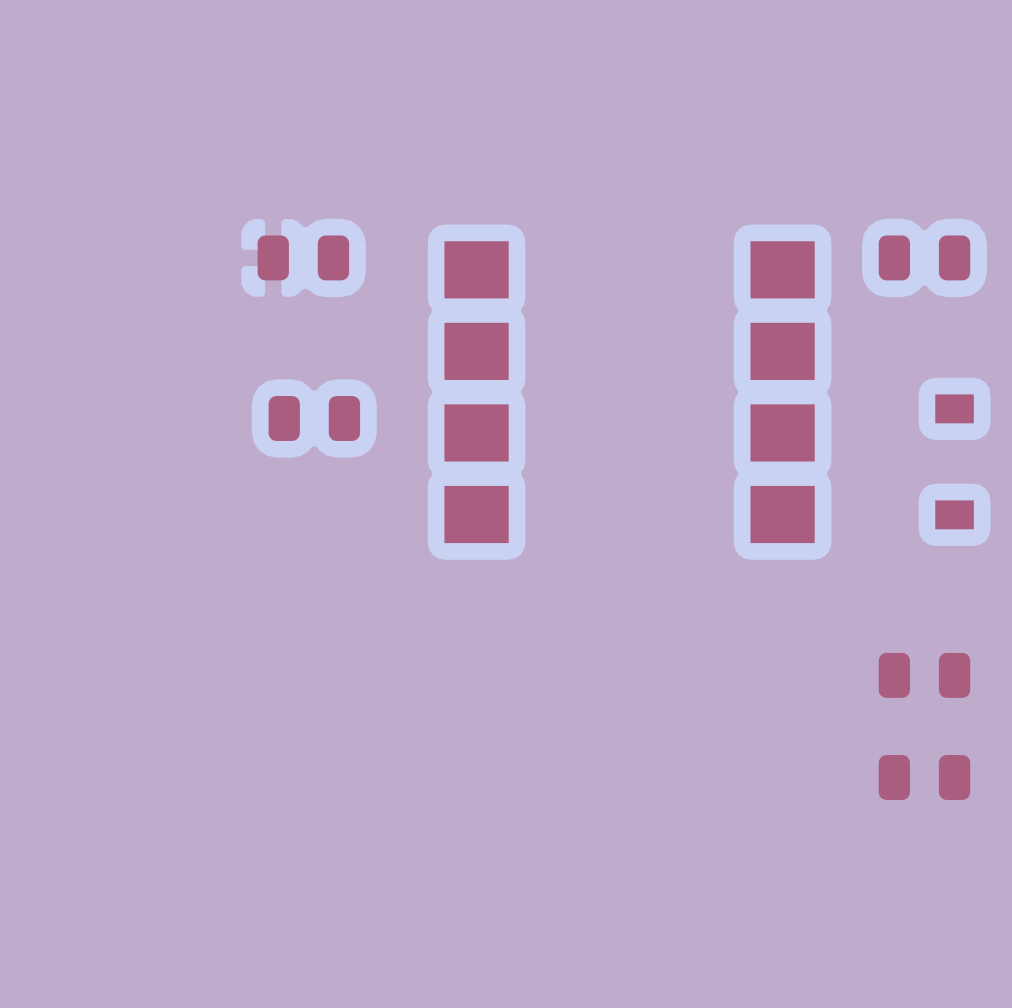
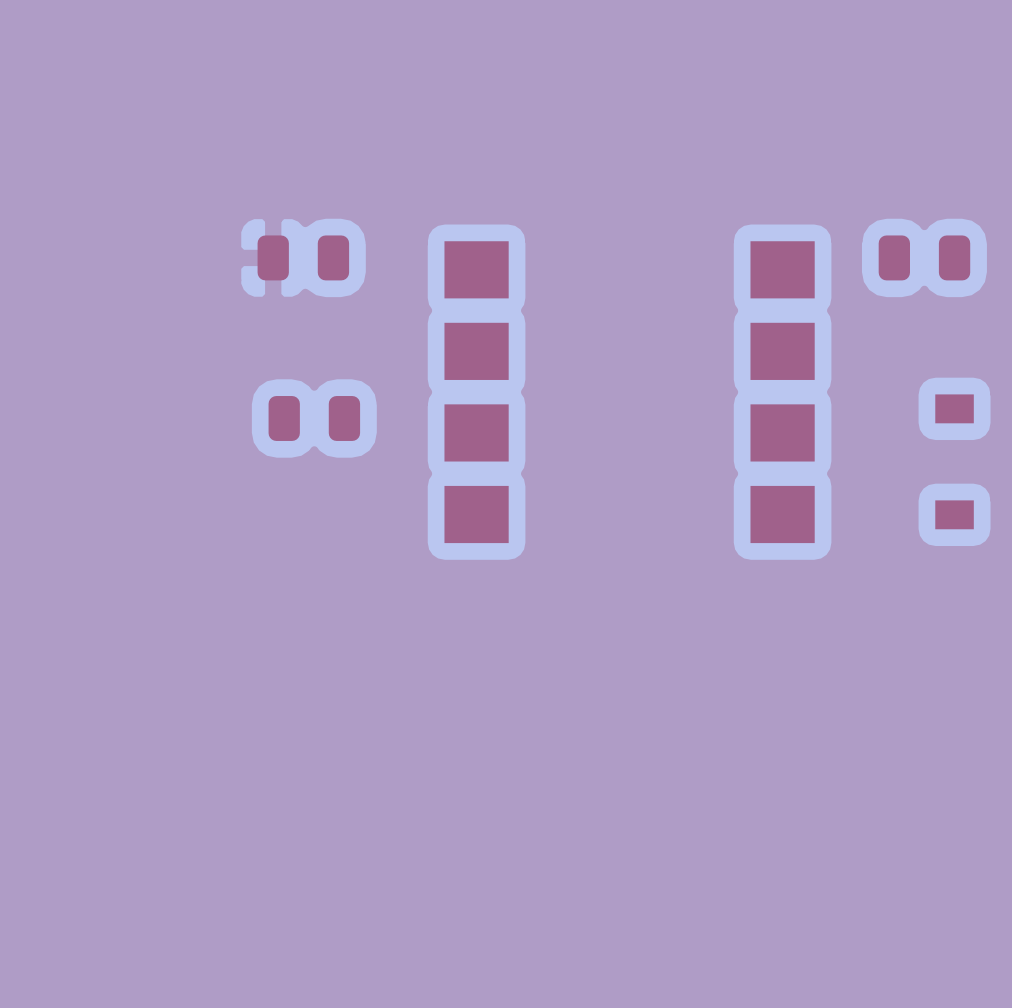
part: (924, 675) -> none
part: (924, 777) -> none

